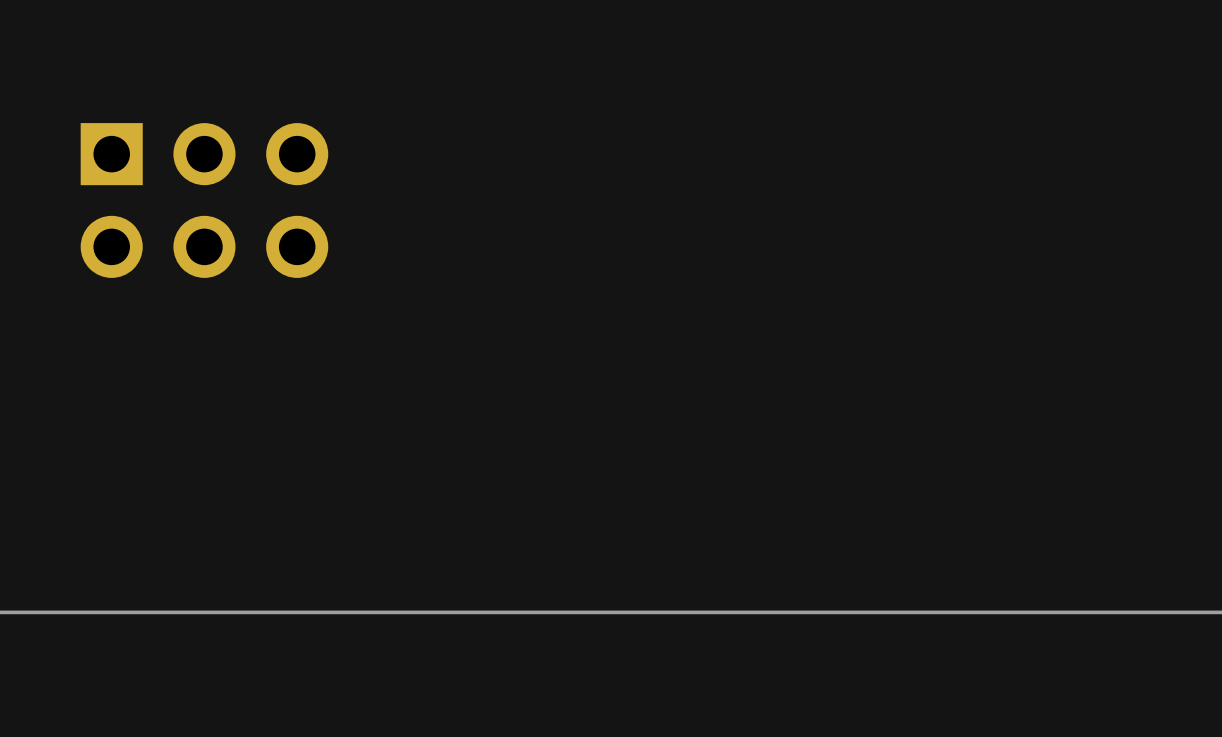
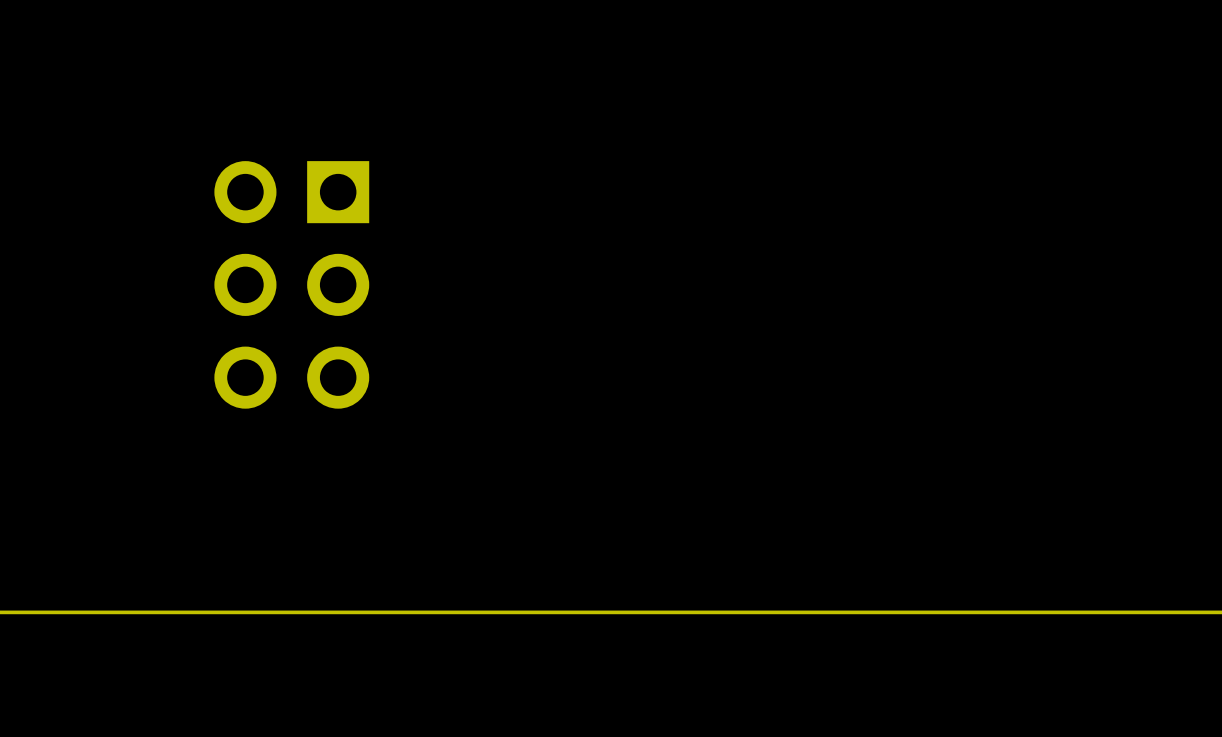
part rotation: 0° (204, 200) -> 90° clockwise (291, 284)

